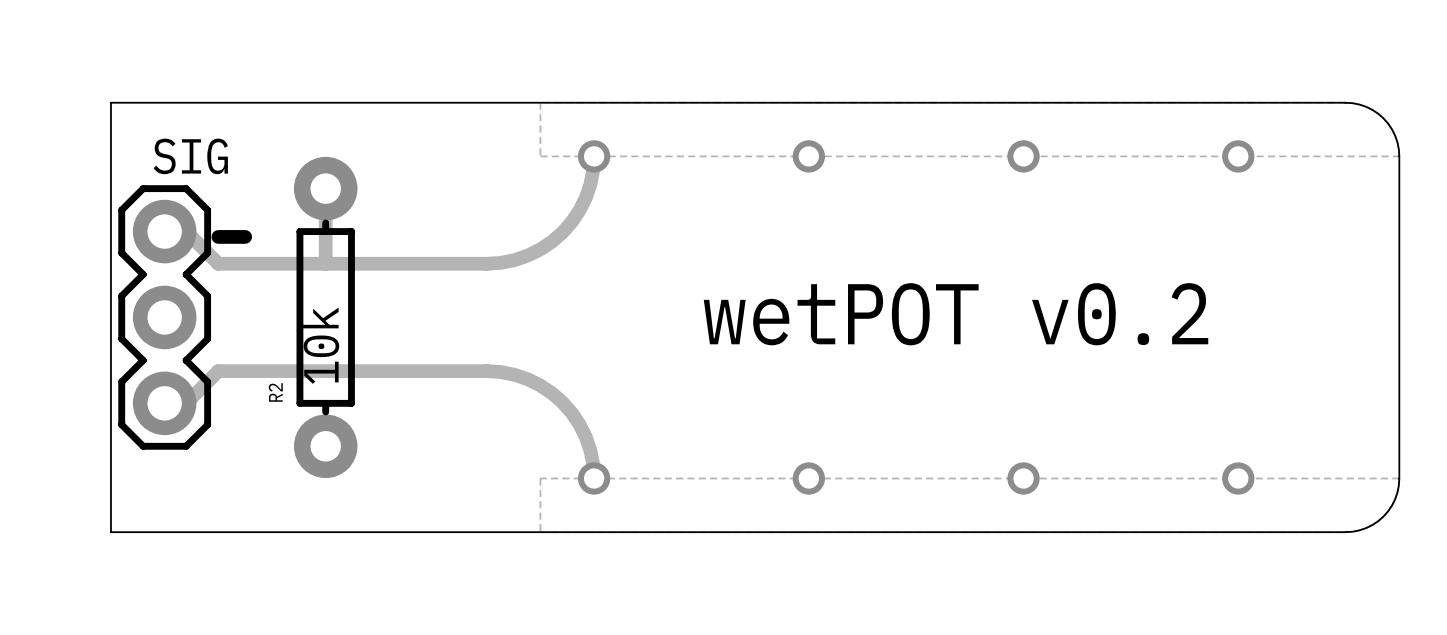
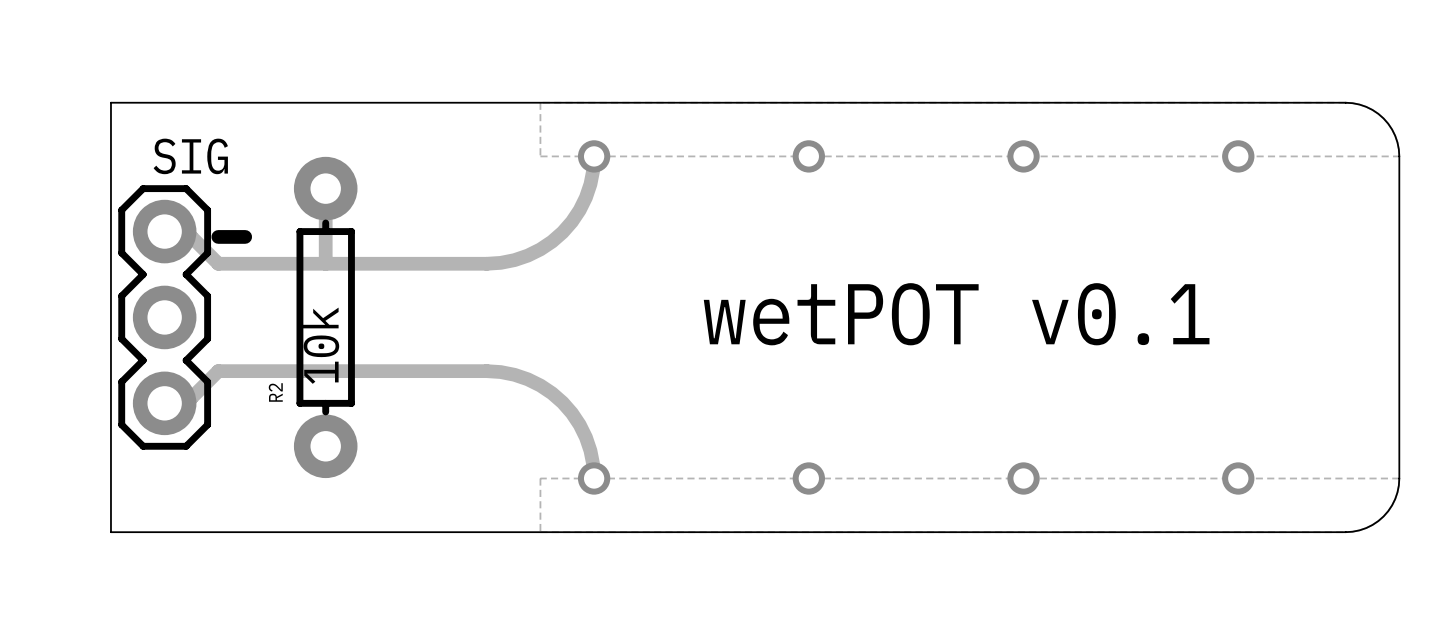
text: wetPOT v0.2 (956, 314) -> wetPOT v0.1 (956, 314)

